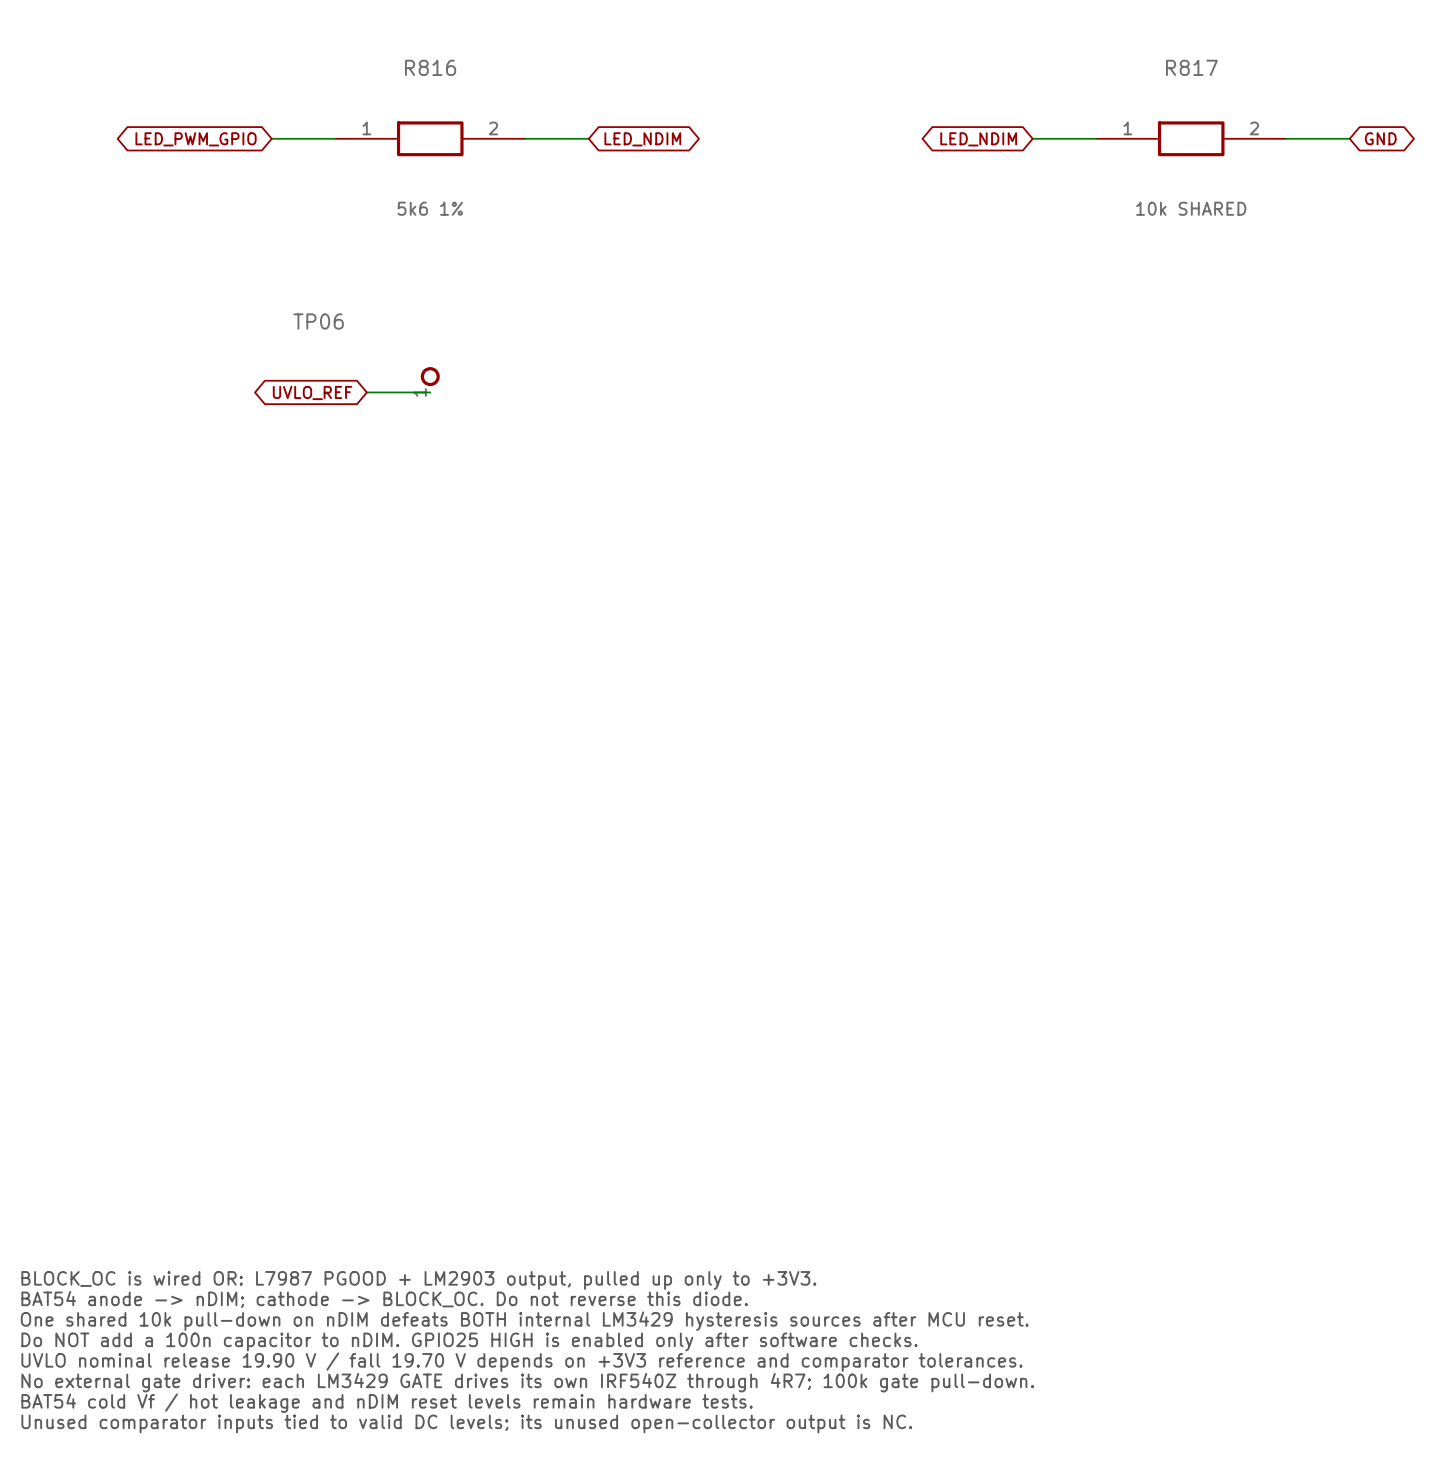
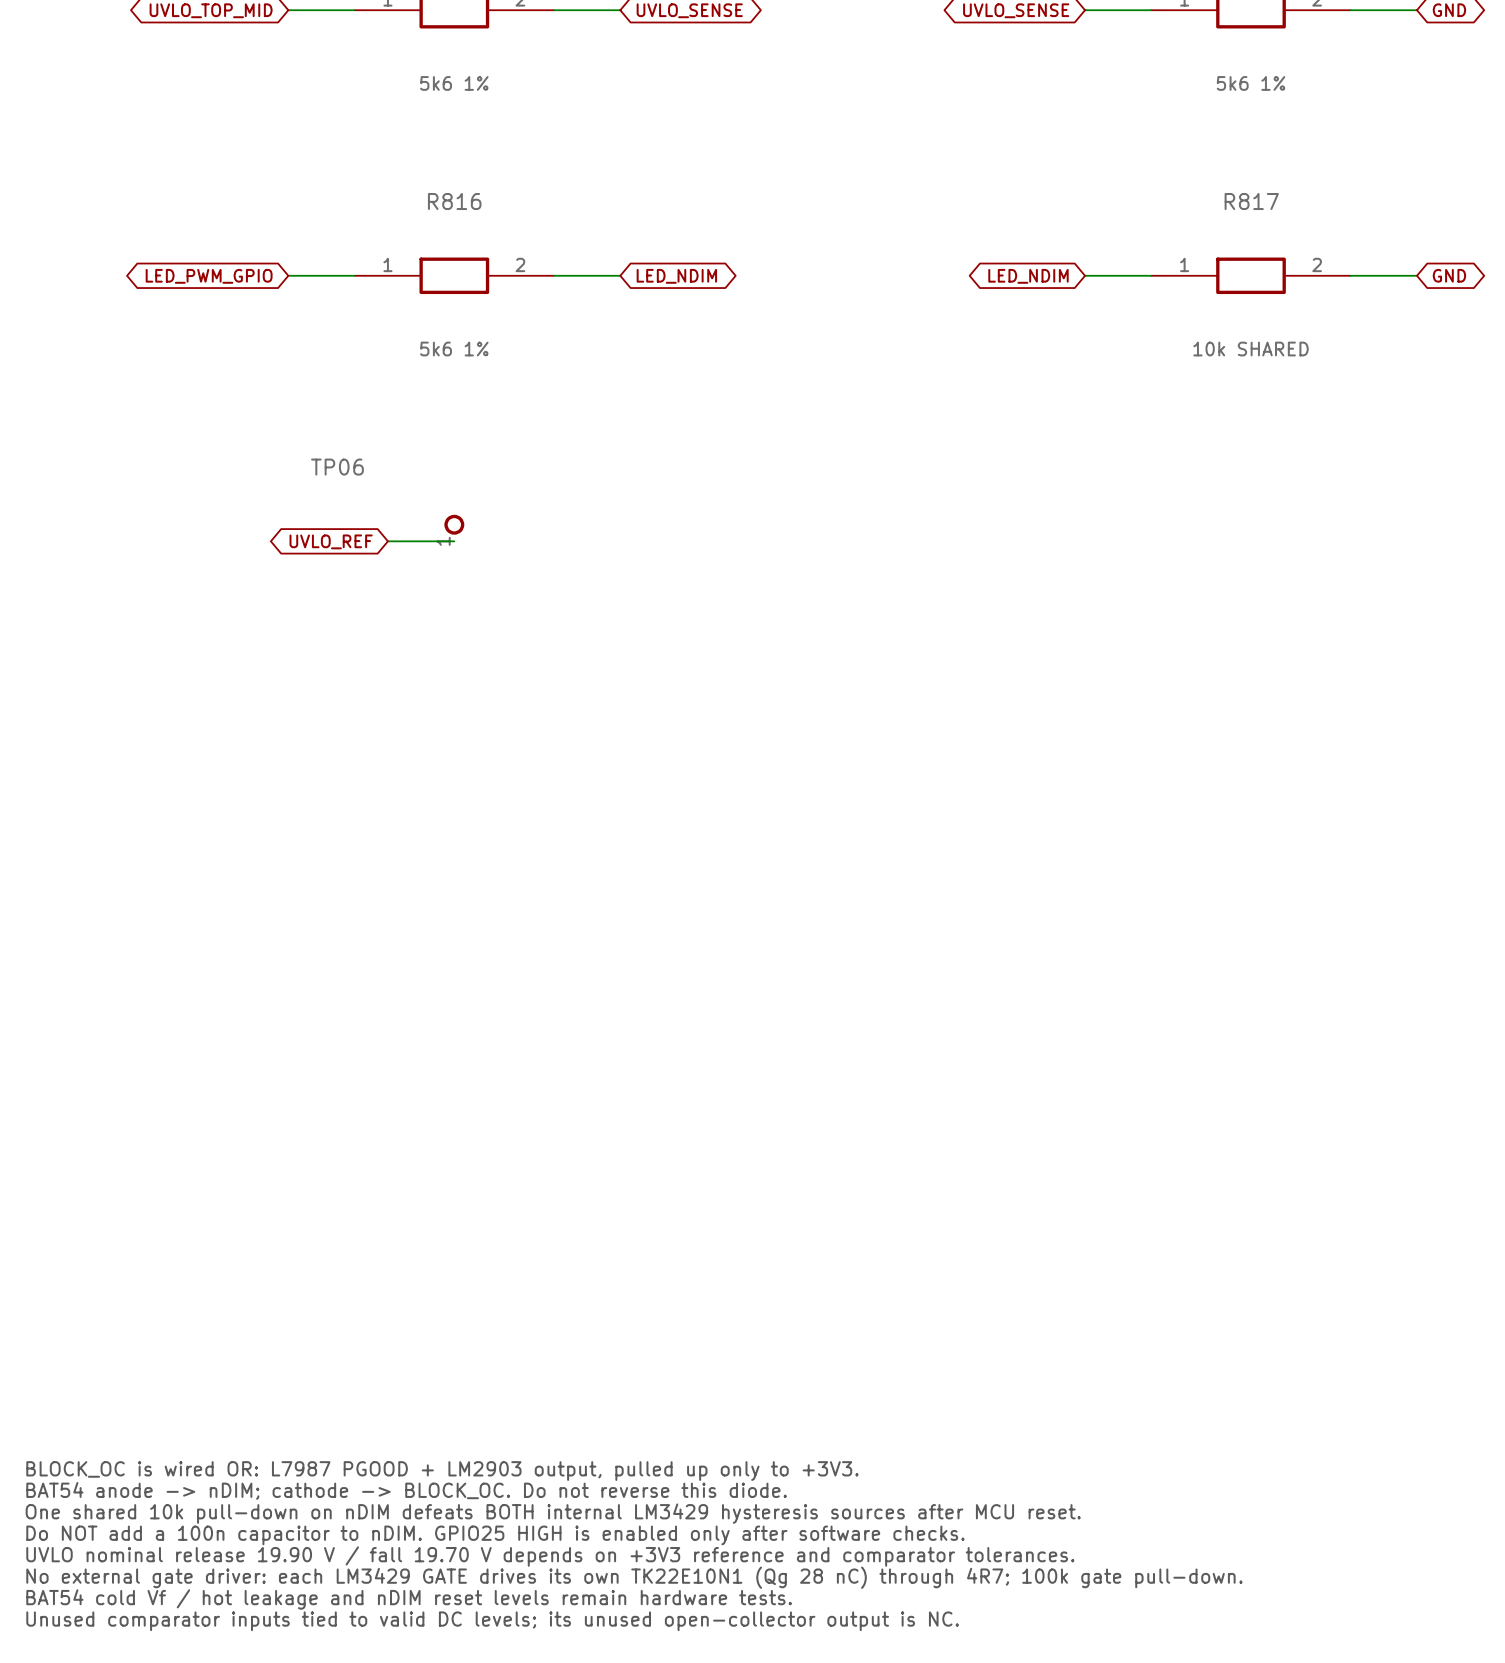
text: No external gate driver: each LM3429 GATE drives its own IRF540Z through 4R7; 100k gate pull-down. (527, 1382) -> No external gate driver: each LM3429 GATE drives its own TK22E10N1 (Qg 28 nC) through 4R7; 100k gate pull-down. (634, 1577)

